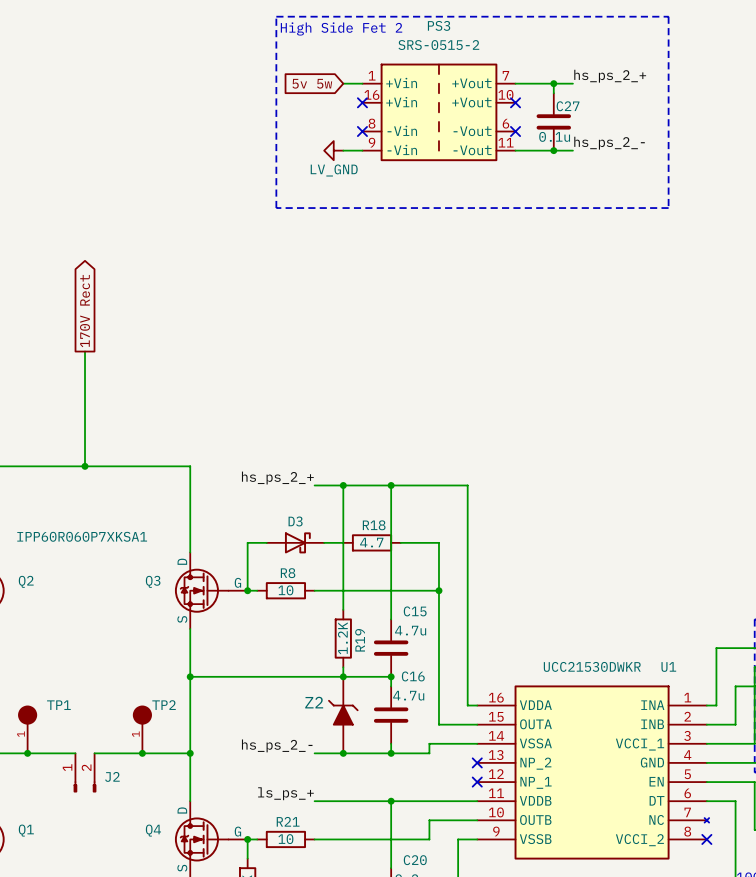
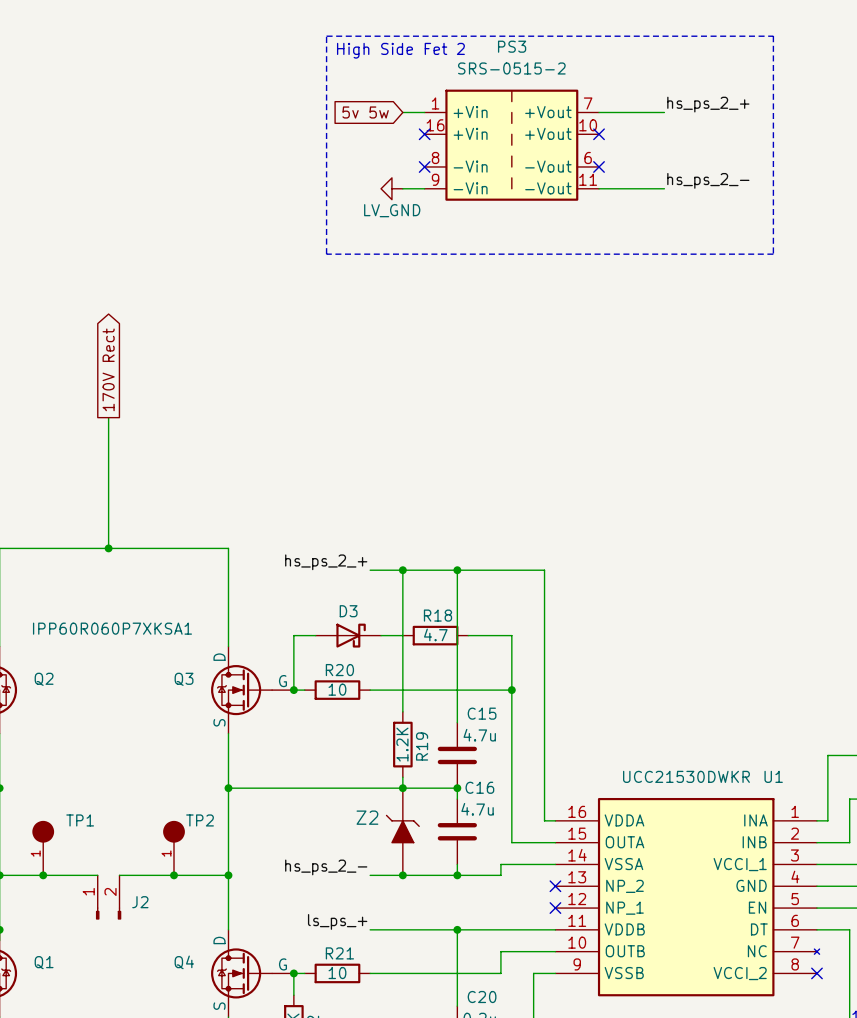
wire: (553, 83) (553, 93) -> none
junction: (553, 83) -> none
C27: 0.1u (553, 121) -> none
junction: (553, 150) -> none
R8 name: R8 (288, 573) -> R20 (339, 670)

